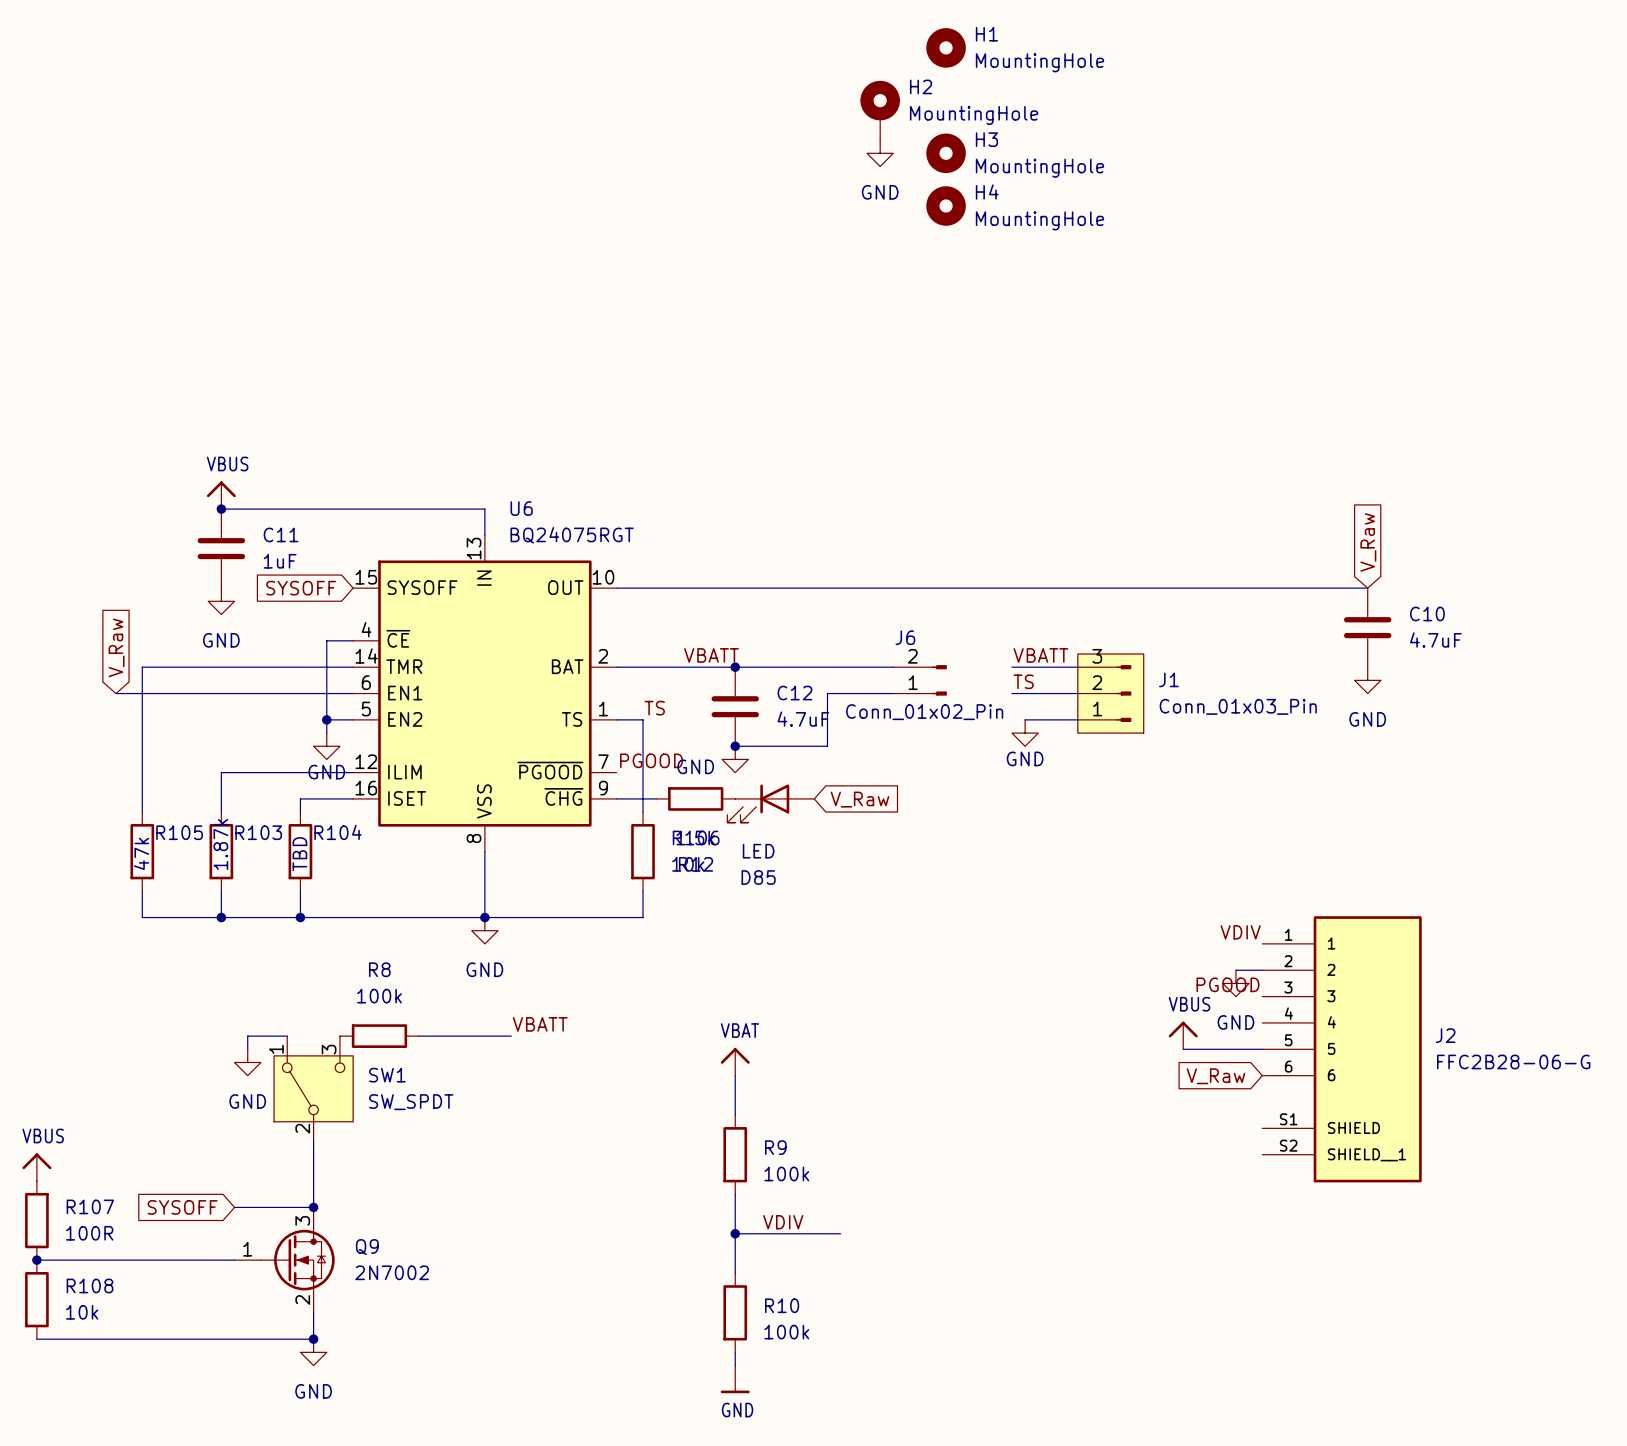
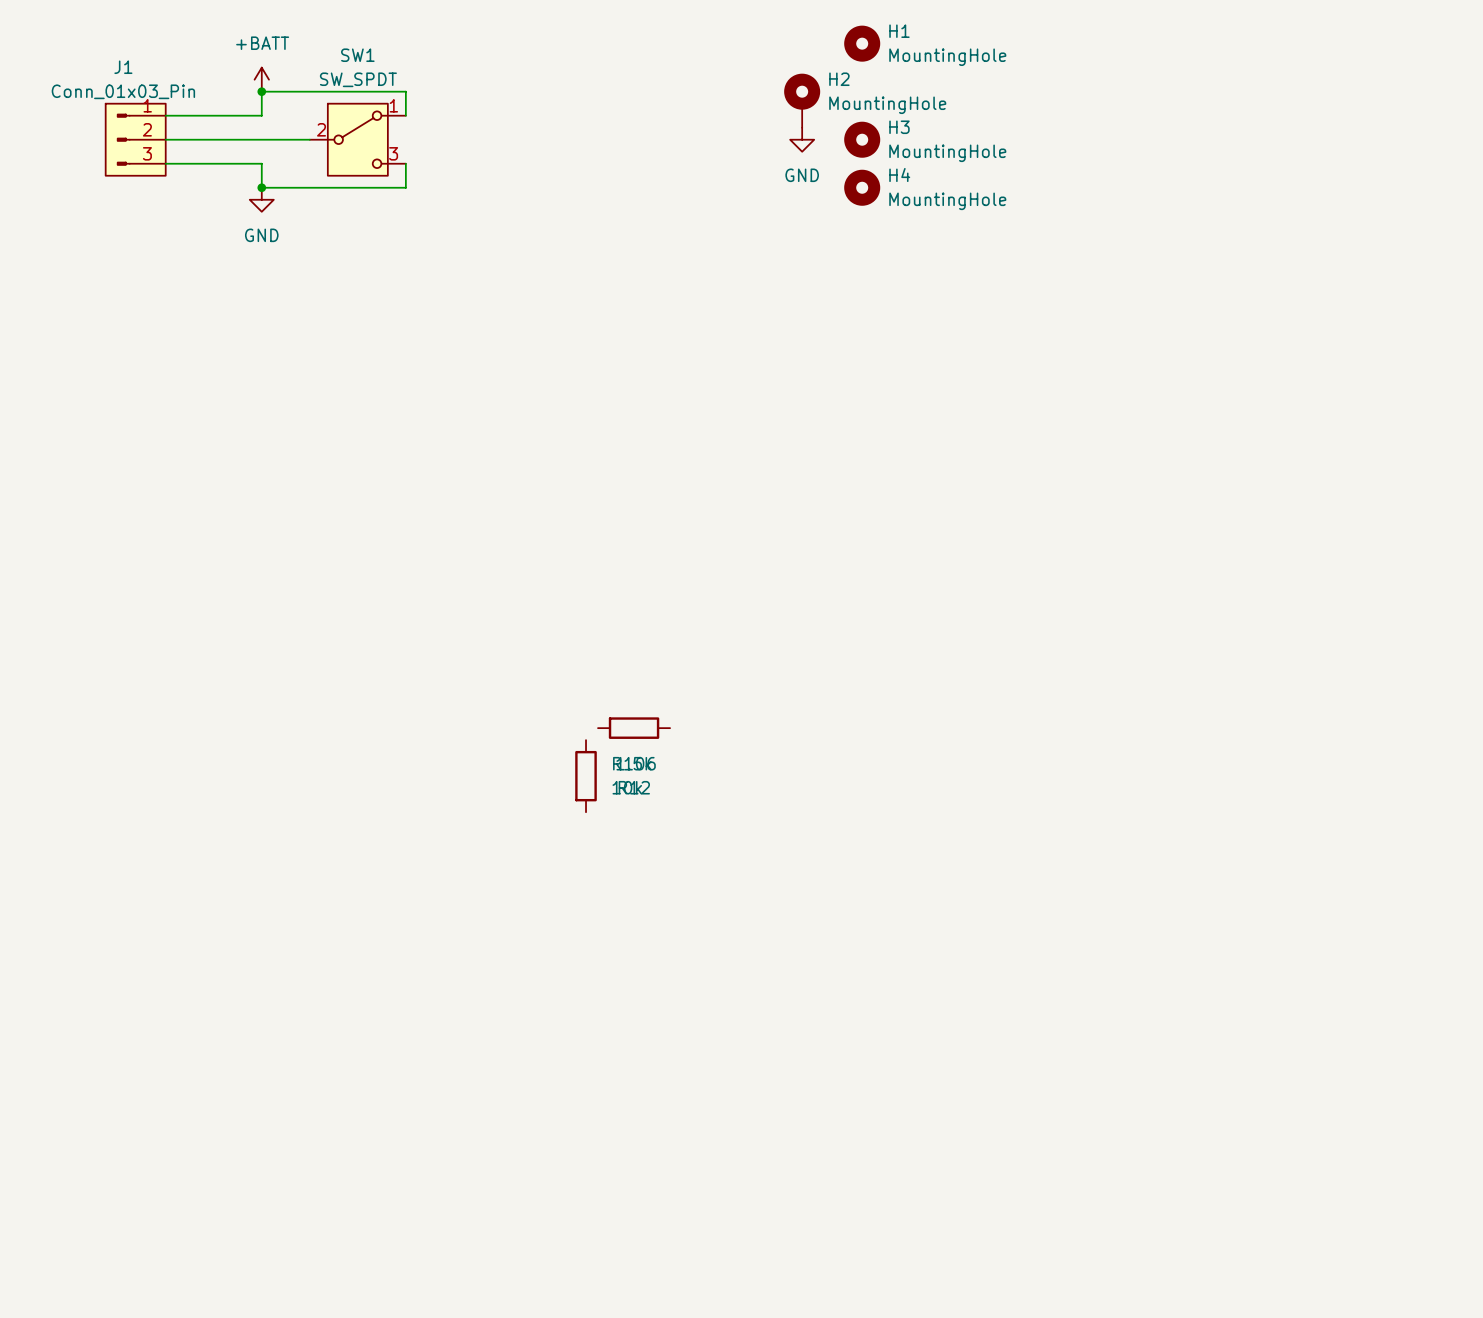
power symbol: none -> +BATT (261, 79)
junction: none -> (261, 91)
wire: none -> (165, 115) (261, 115) (261, 91) (405, 91) (405, 115)
wire: none -> (165, 139) (309, 139)
wire: none -> (165, 163) (261, 163) (261, 187) (405, 187) (405, 163)
junction: none -> (261, 187)
power symbol: none -> GND (261, 199)
power symbol: VBUS (221, 495) -> none
wire: (221, 509) (484, 509) (484, 535) -> none
junction: (221, 509) -> none
global label: V_Raw (1368, 542) -> none
C11: 1uF (221, 548) -> none
global label: SYSOFF (301, 588) -> none
wire: (616, 588) (1367, 588) -> none
power symbol: GND (221, 601) -> none
C10: 4.7uF (1367, 627) -> none
wire: (353, 640) (326, 640) (326, 733) -> none
global label: V_Raw (116, 647) -> none
label: VBATT (711, 655) -> none
label: VBATT (1040, 655) -> none
wire: (353, 667) (142, 667) (142, 812) -> none
wire: (616, 667) (893, 667) -> none
junction: (735, 667) -> none
wire: (1011, 667) (1077, 667) -> none
J1 name position: J1 (1168, 679) -> J1 (123, 67)
J6: Conn_01x02_Pin (920, 680) -> none
power symbol: GND (1367, 680) -> none
label: TS (1023, 681) -> none
wire: (115, 693) (353, 693) -> none
U6: BQ24075RGT (484, 693) -> none
wire: (893, 693) (827, 693) (827, 746) (735, 746) -> none
wire: (1011, 693) (1077, 693) -> none
J1 rotation: 0° (1110, 693) -> 180° (135, 139)
J1 position: (1110, 693) -> (135, 139)
C12: 4.7uF (735, 706) -> none
J1 value position: Conn_01x03_Pin (1238, 706) -> Conn_01x03_Pin (123, 91)
label: TS (654, 708) -> none
wire: (326, 719) (353, 719) -> none
junction: (326, 719) -> none
wire: (616, 719) (643, 719) (643, 812) -> none
wire: (1025, 719) (1077, 719) -> none
power symbol: GND (1025, 733) -> none
power symbol: GND (326, 746) -> none
junction: (735, 746) -> none
power symbol: GND (735, 759) -> none
label: PGOOD (651, 760) -> none
wire: (353, 772) (221, 772) (221, 812) -> none
wire: (353, 798) (300, 798) (300, 812) -> none
wire: (616, 798) (656, 798) -> none
global label: V_Raw (859, 799) -> none
D85: LED (770, 803) -> none
R105: 47k (142, 851) -> none
R103: 1.87k (221, 851) -> none
R104: TBD (300, 851) -> none
wire: (484, 851) (484, 917) -> none
wire: (142, 891) (142, 917) (643, 917) (643, 891) -> none
wire: (221, 891) (221, 917) -> none
wire: (300, 891) (300, 917) -> none
junction: (221, 917) -> none
junction: (300, 917) -> none
junction: (484, 917) -> none
power symbol: GND (484, 930) -> none
label: VDIV (1240, 932) -> none
wire: (1235, 970) (1262, 970) -> none
power symbol: GND (1235, 983) -> none
label: PGOOD (1228, 984) -> none
label: VBATT (540, 1024) -> none
power symbol: VBUS (1183, 1035) -> none
wire: (287, 1036) (247, 1036) (247, 1049) -> none
R8: 100k (379, 1036) -> none
wire: (419, 1036) (511, 1036) -> none
wire: (1183, 1049) (1262, 1049) -> none
J2: FFC2B28-06-G (1342, 1049) -> none
power symbol: VBAT (735, 1061) -> none
power symbol: GND (247, 1062) -> none
SW1 name position: SW1 (387, 1075) -> SW1 (357, 55)
wire: (735, 1075) (735, 1115) -> none
global label: V_Raw (1216, 1076) -> none
SW1 rotation: 0° (313, 1088) -> 90° clockwise (357, 139)
SW1 position: (313, 1088) -> (357, 139)
SW1 value position: SW_SPDT (411, 1102) -> SW_SPDT (358, 79)
wire: (313, 1141) (313, 1207) (234, 1207) -> none
R9: 100k (735, 1154) -> none
power symbol: VBUS (36, 1167) -> none
wire: (735, 1194) (735, 1273) -> none
global label: SYSOFF (182, 1207) -> none
junction: (313, 1207) -> none
R107: 100R (36, 1220) -> none
label: VDIV (783, 1222) -> none
wire: (735, 1233) (840, 1233) -> none
junction: (735, 1233) -> none
wire: (36, 1260) (234, 1260) -> none
junction: (36, 1260) -> none
Q9: 2N7002 (284, 1260) -> none
R108: 10k (36, 1299) -> none
wire: (313, 1312) (313, 1339) (36, 1339) -> none
R10: 100k (735, 1312) -> none
junction: (313, 1339) -> none
power symbol: GND (313, 1352) -> none
wire: (735, 1352) (735, 1365) -> none
power symbol: GND (735, 1379) -> none

